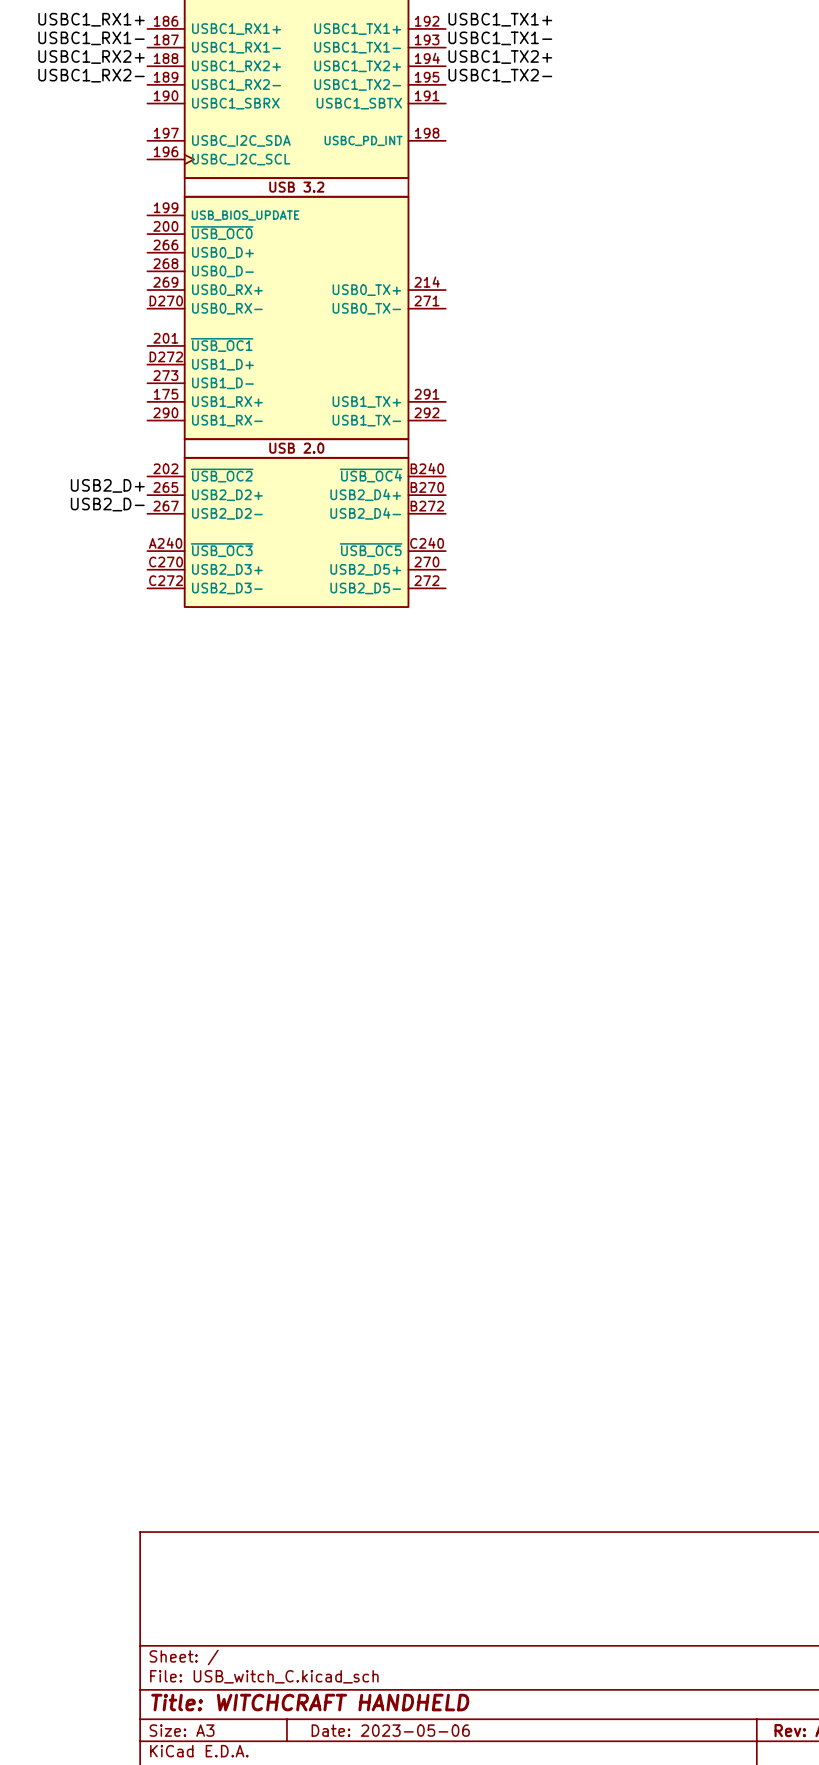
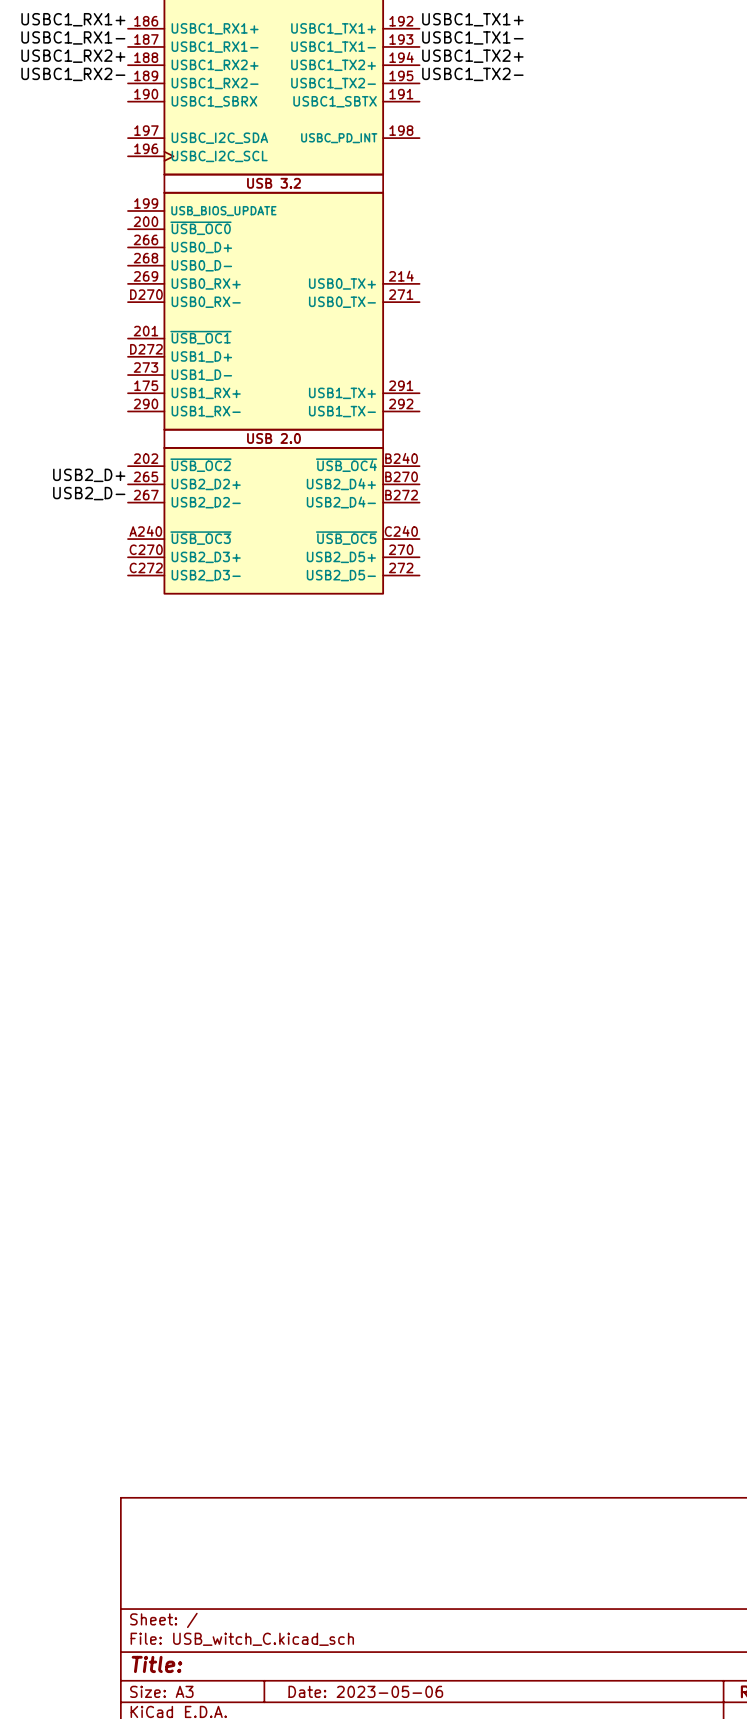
title block: Title: WITCHCRAFT HANDHELD (310, 1702) -> Title: (156, 1664)

